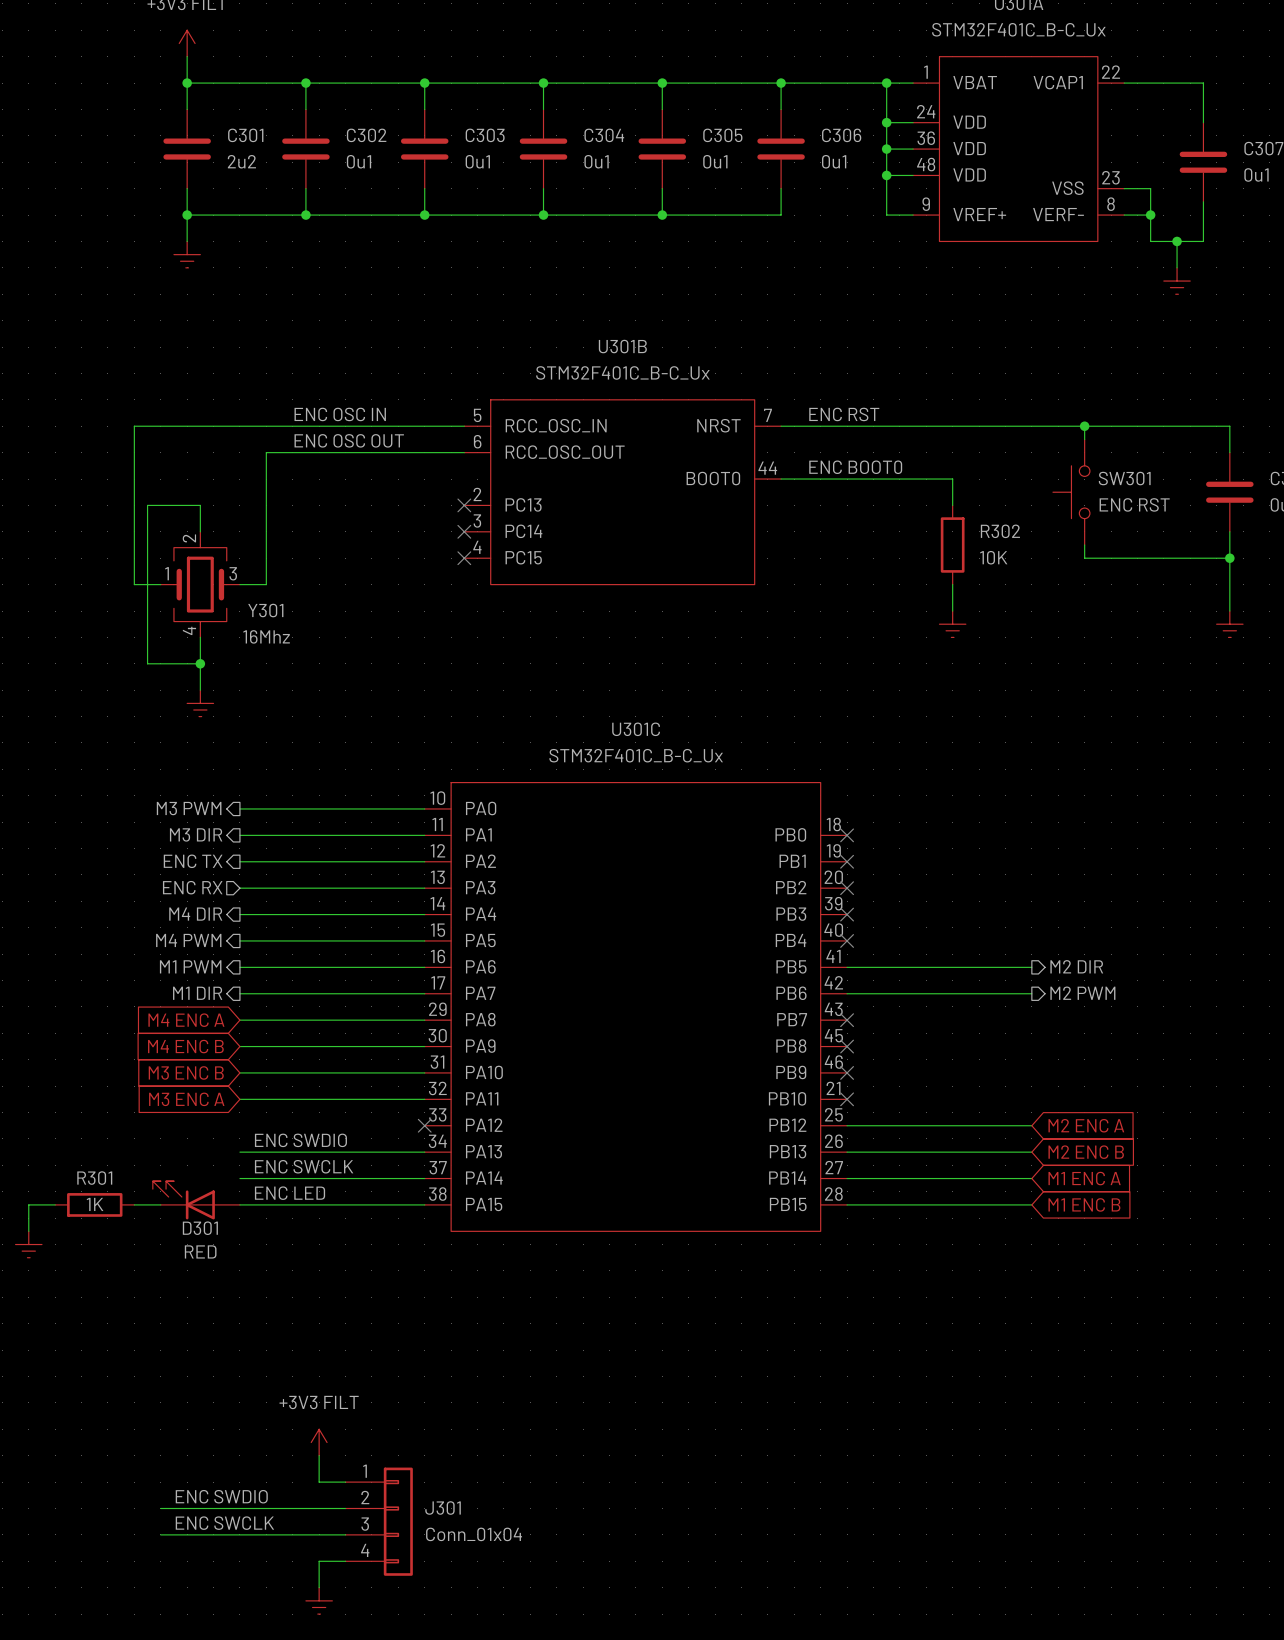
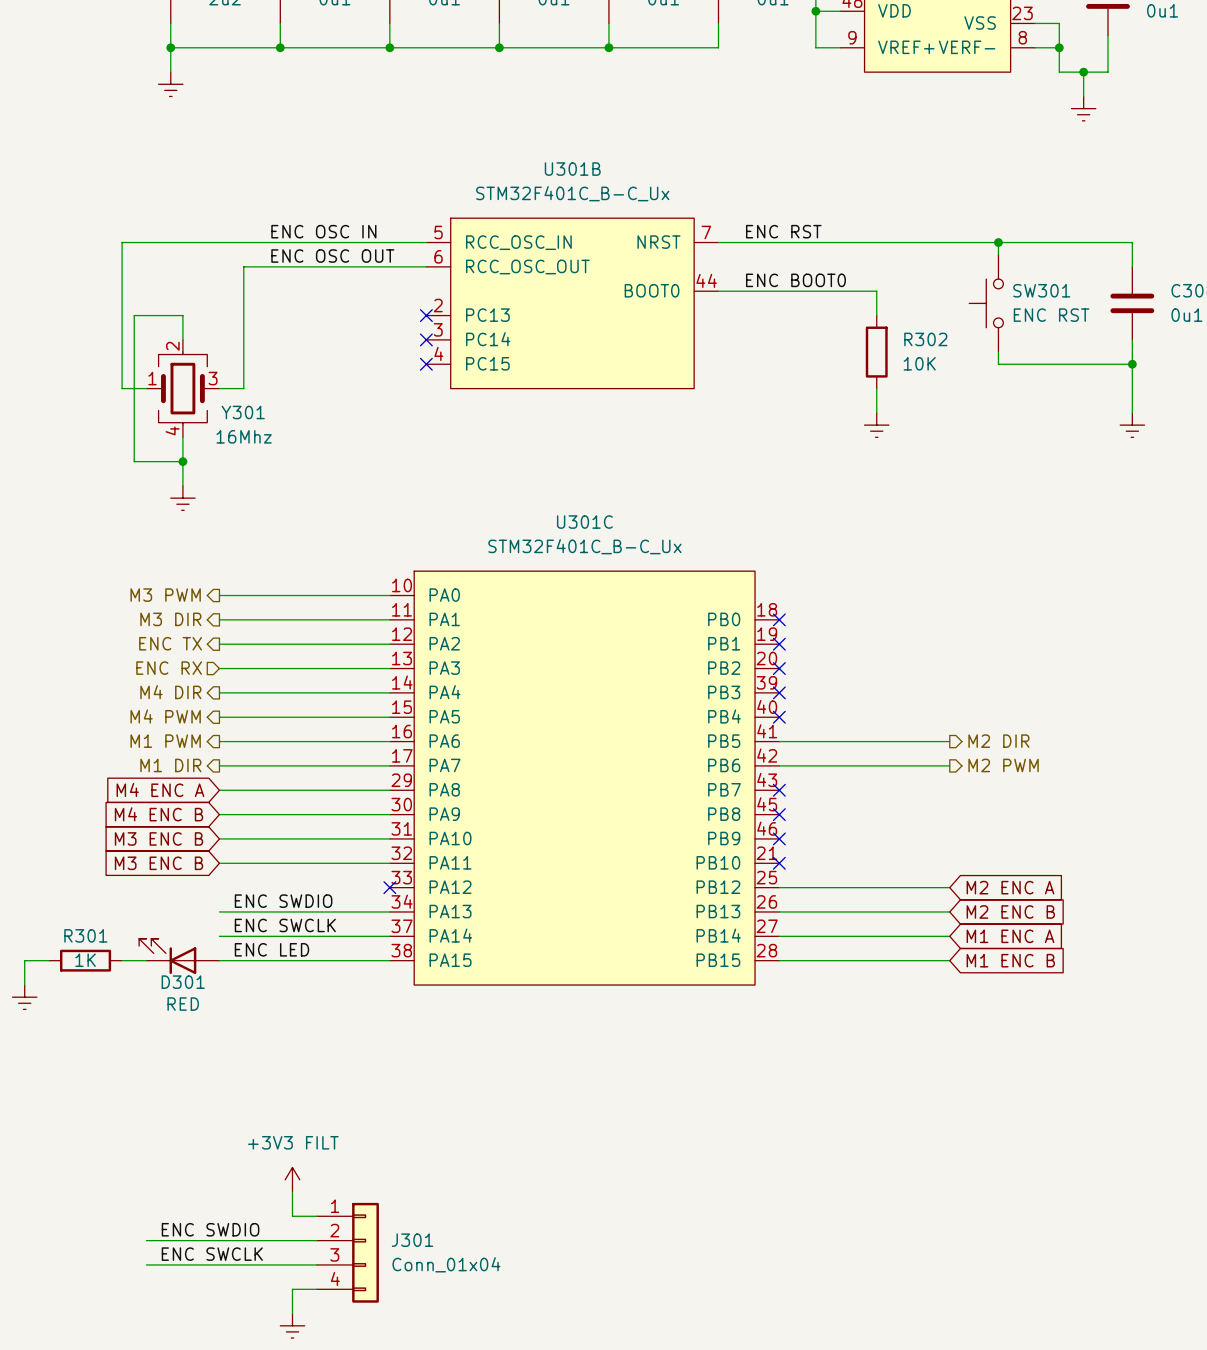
global label: M3 ENC A (186, 1099) -> M3 ENC B (159, 863)

